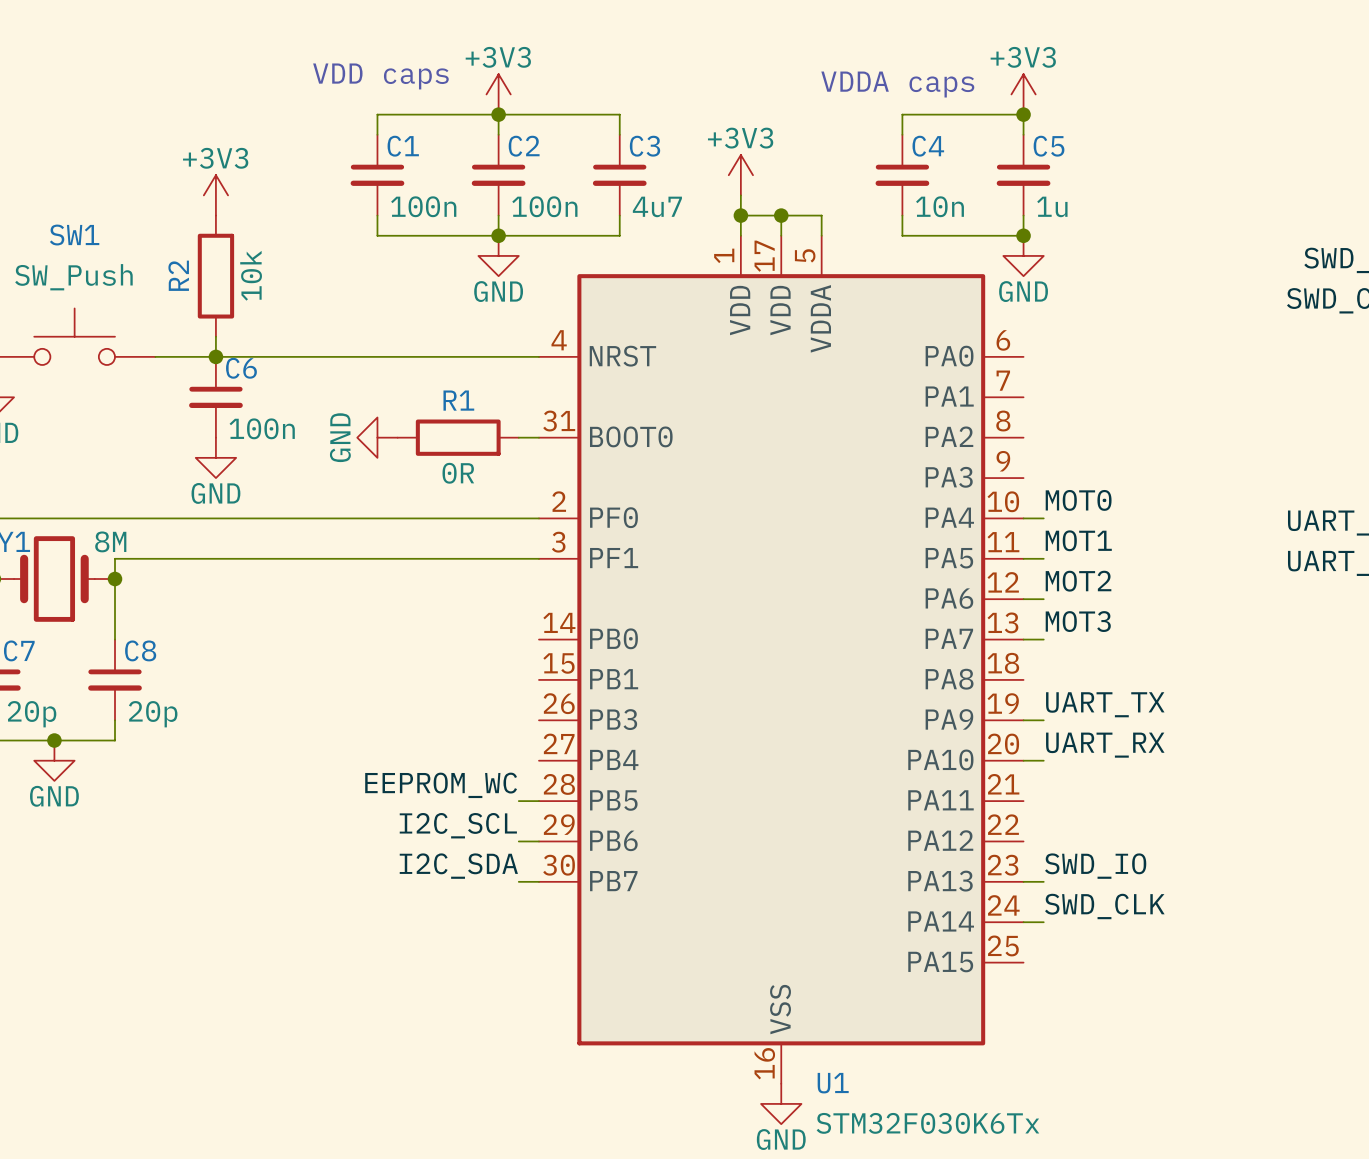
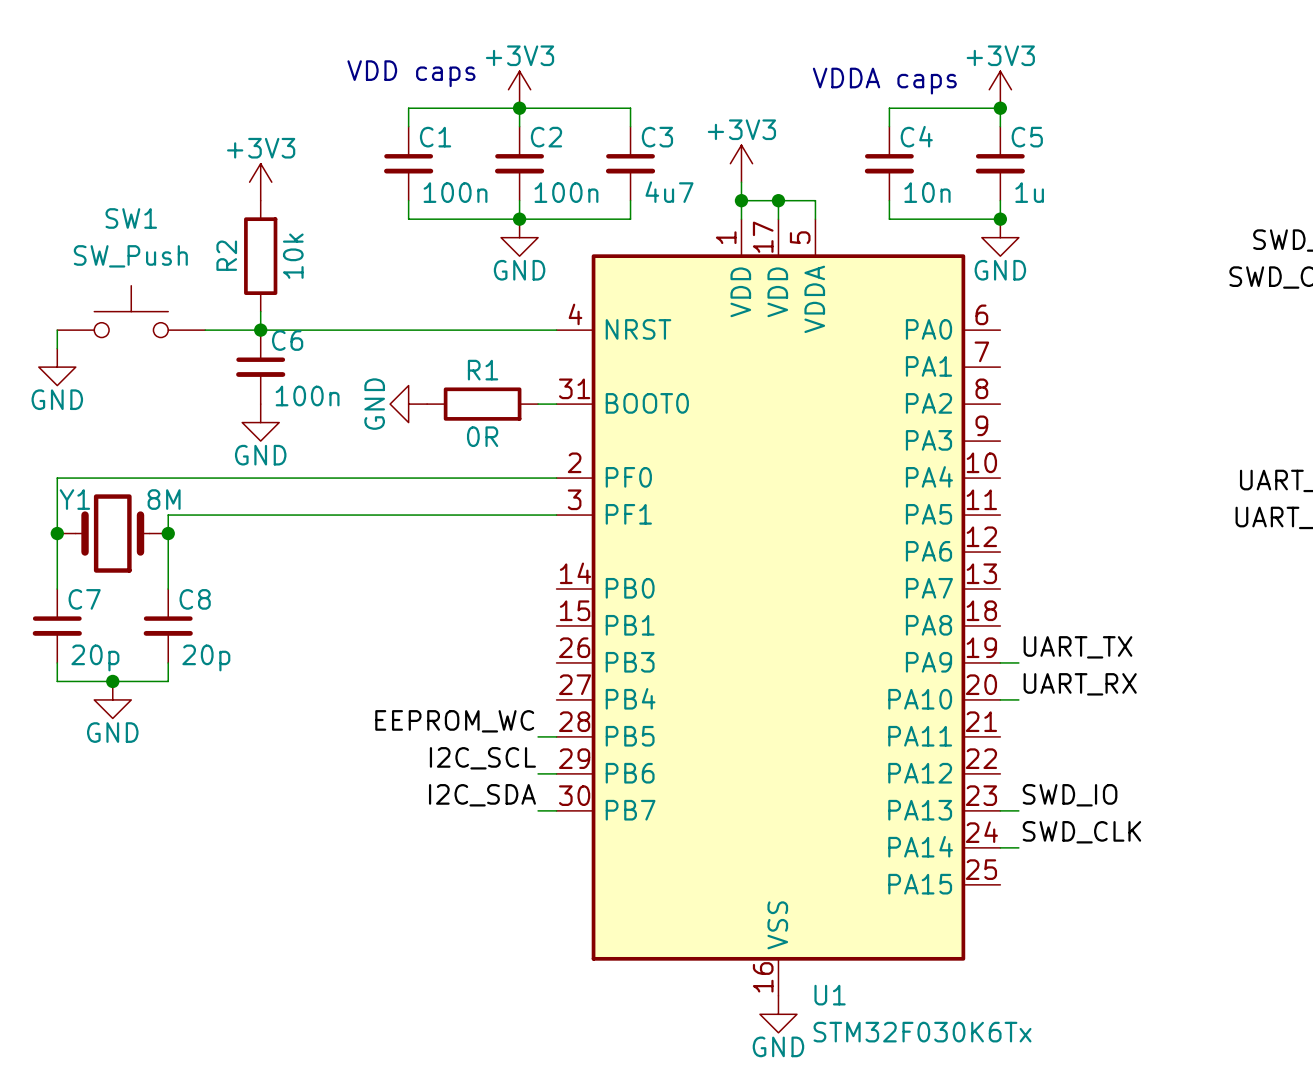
label: MOT0 (1078, 500) -> none
wire: (1023, 518) (1043, 518) -> none
label: MOT1 (1078, 540) -> none
wire: (1023, 558) (1043, 558) -> none
label: MOT2 (1078, 581) -> none
wire: (1023, 599) (1043, 599) -> none
label: MOT3 (1078, 621) -> none
wire: (1023, 639) (1043, 639) -> none

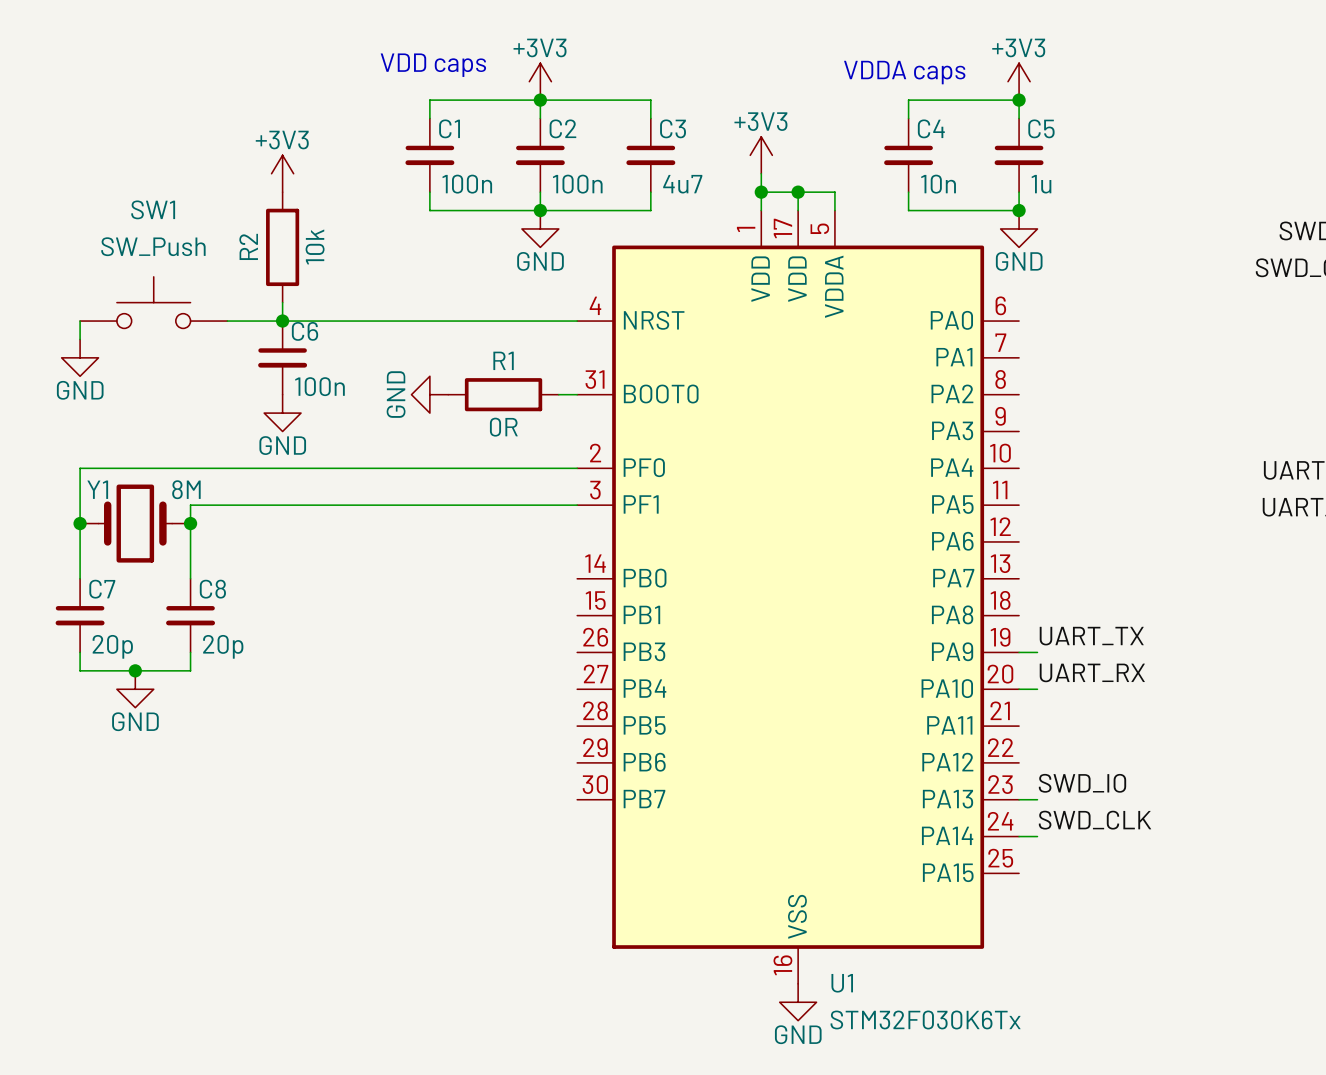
label: EEPROM_WC (454, 721) -> none
wire: (538, 736) (556, 736) -> none
label: I2C_SCL (482, 758) -> none
wire: (538, 773) (556, 773) -> none
label: I2C_SDA (482, 795) -> none
wire: (538, 810) (556, 810) -> none

